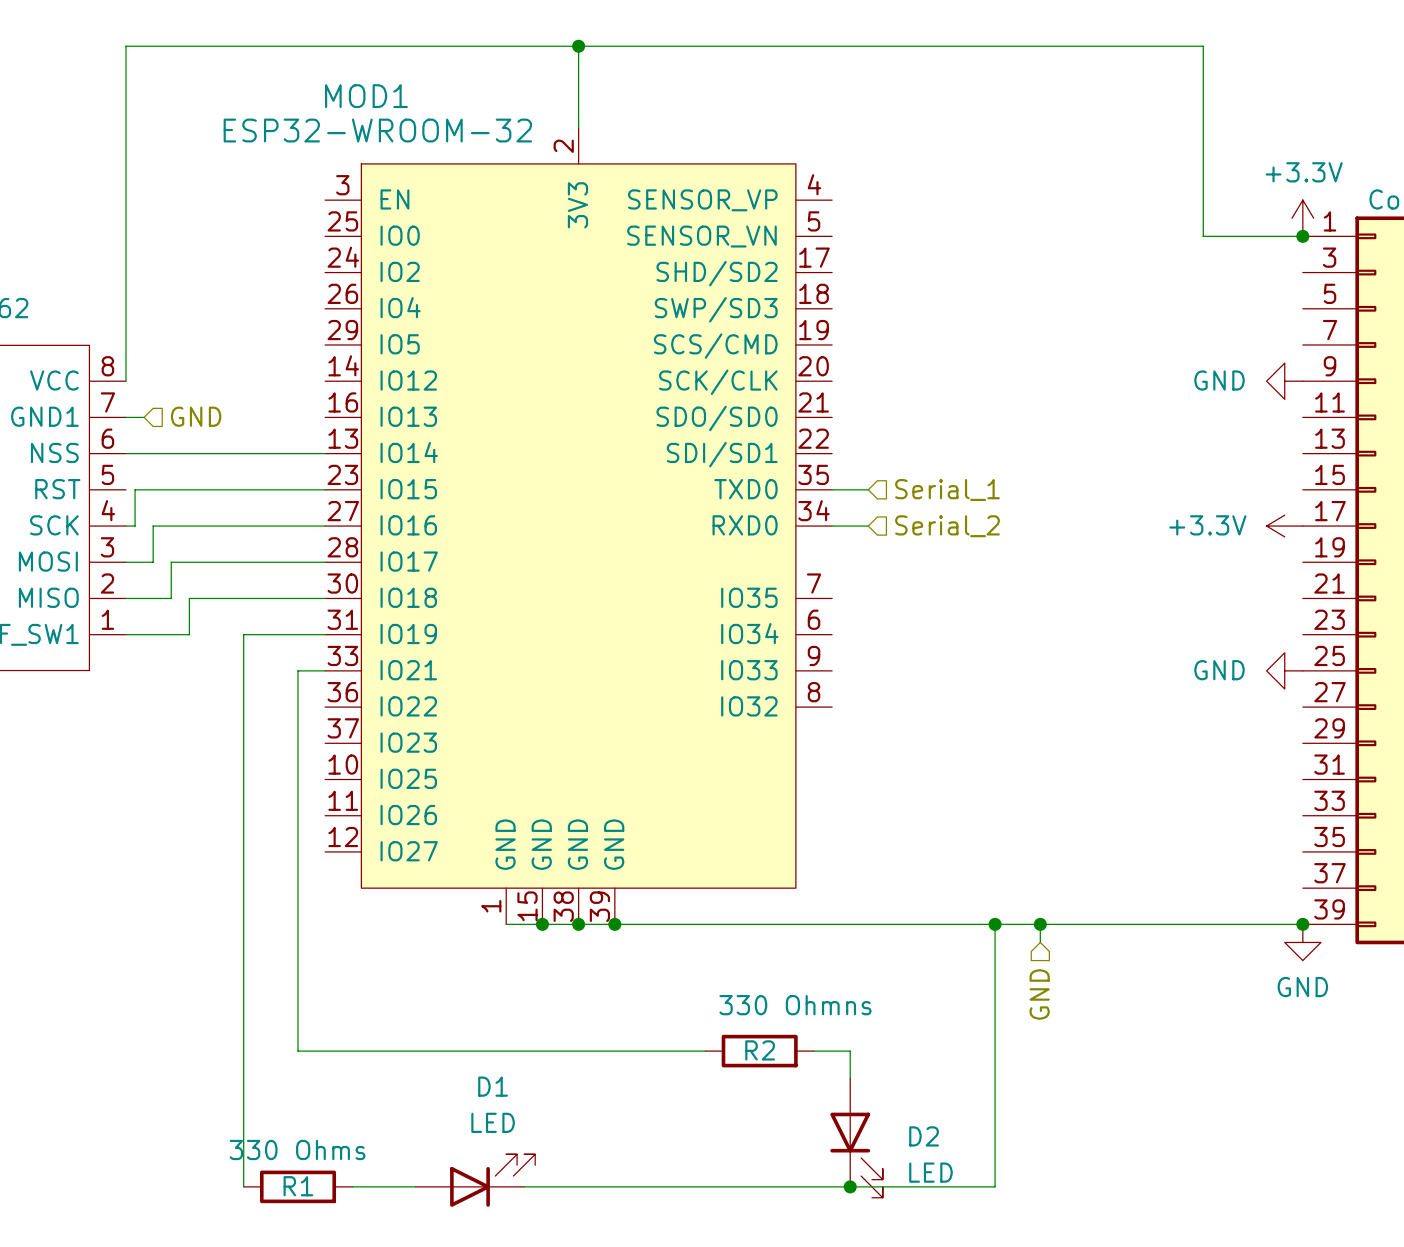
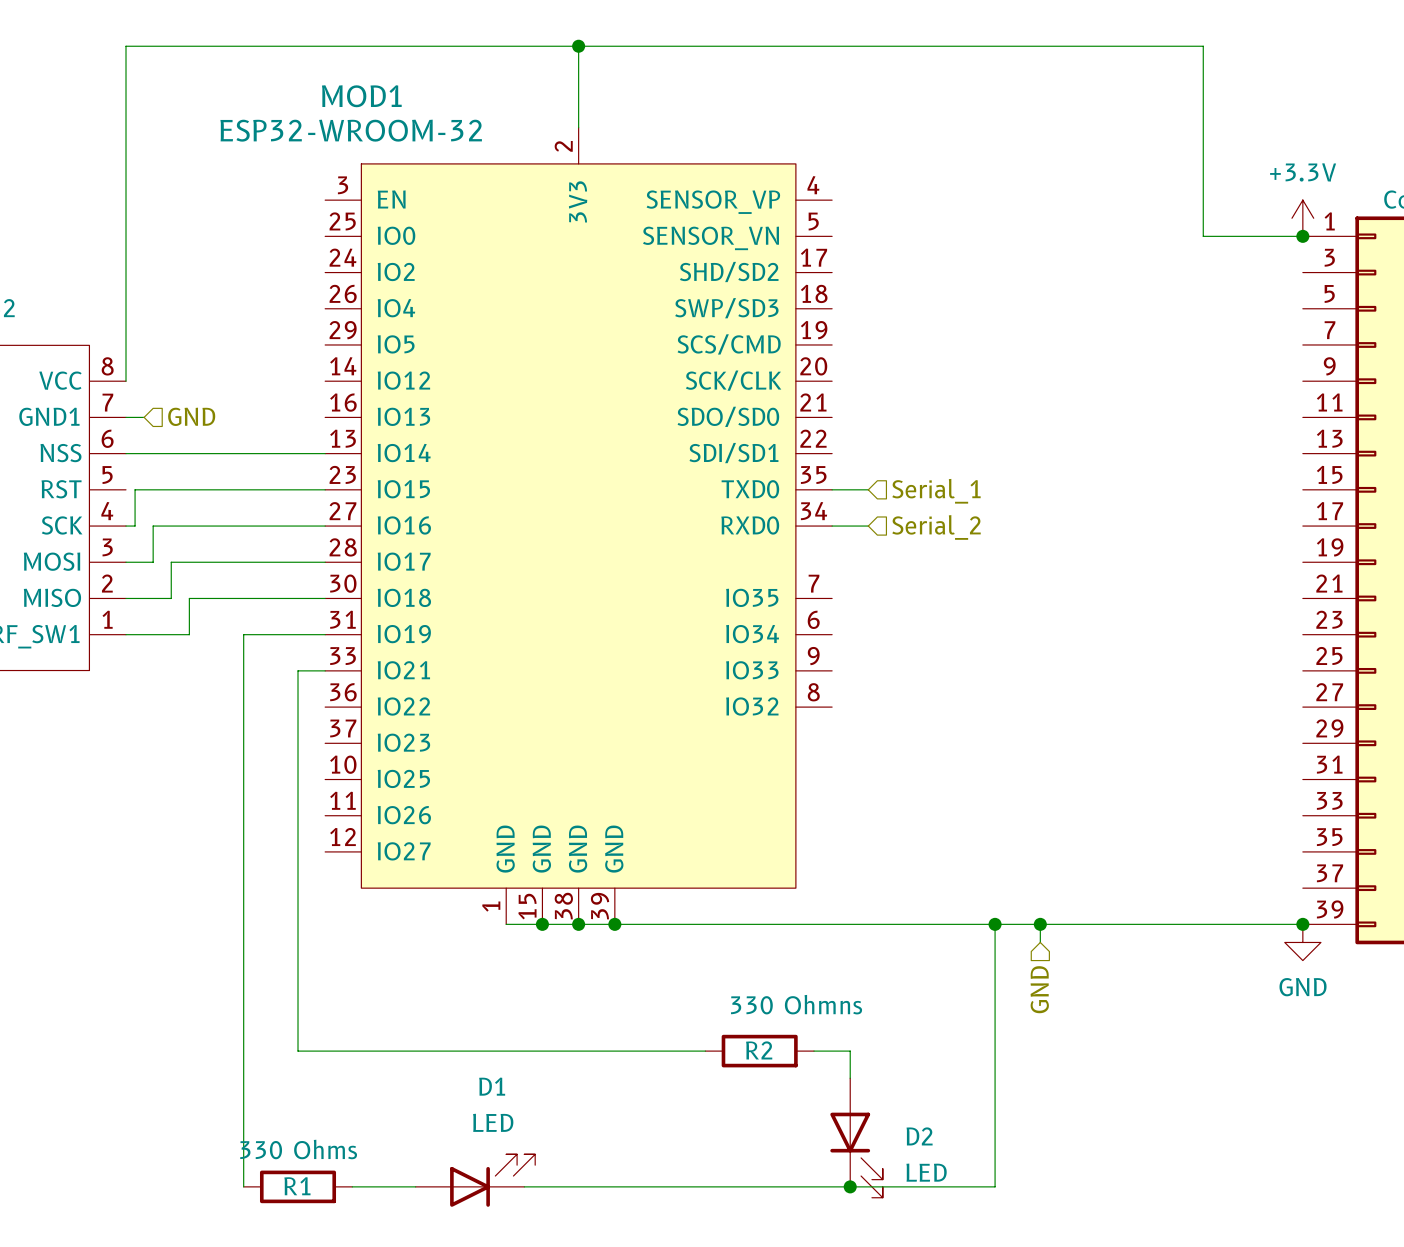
power symbol: GND (1284, 381) -> none
power symbol: +3.3V (1284, 526) -> none
power symbol: GND (1284, 670) -> none

